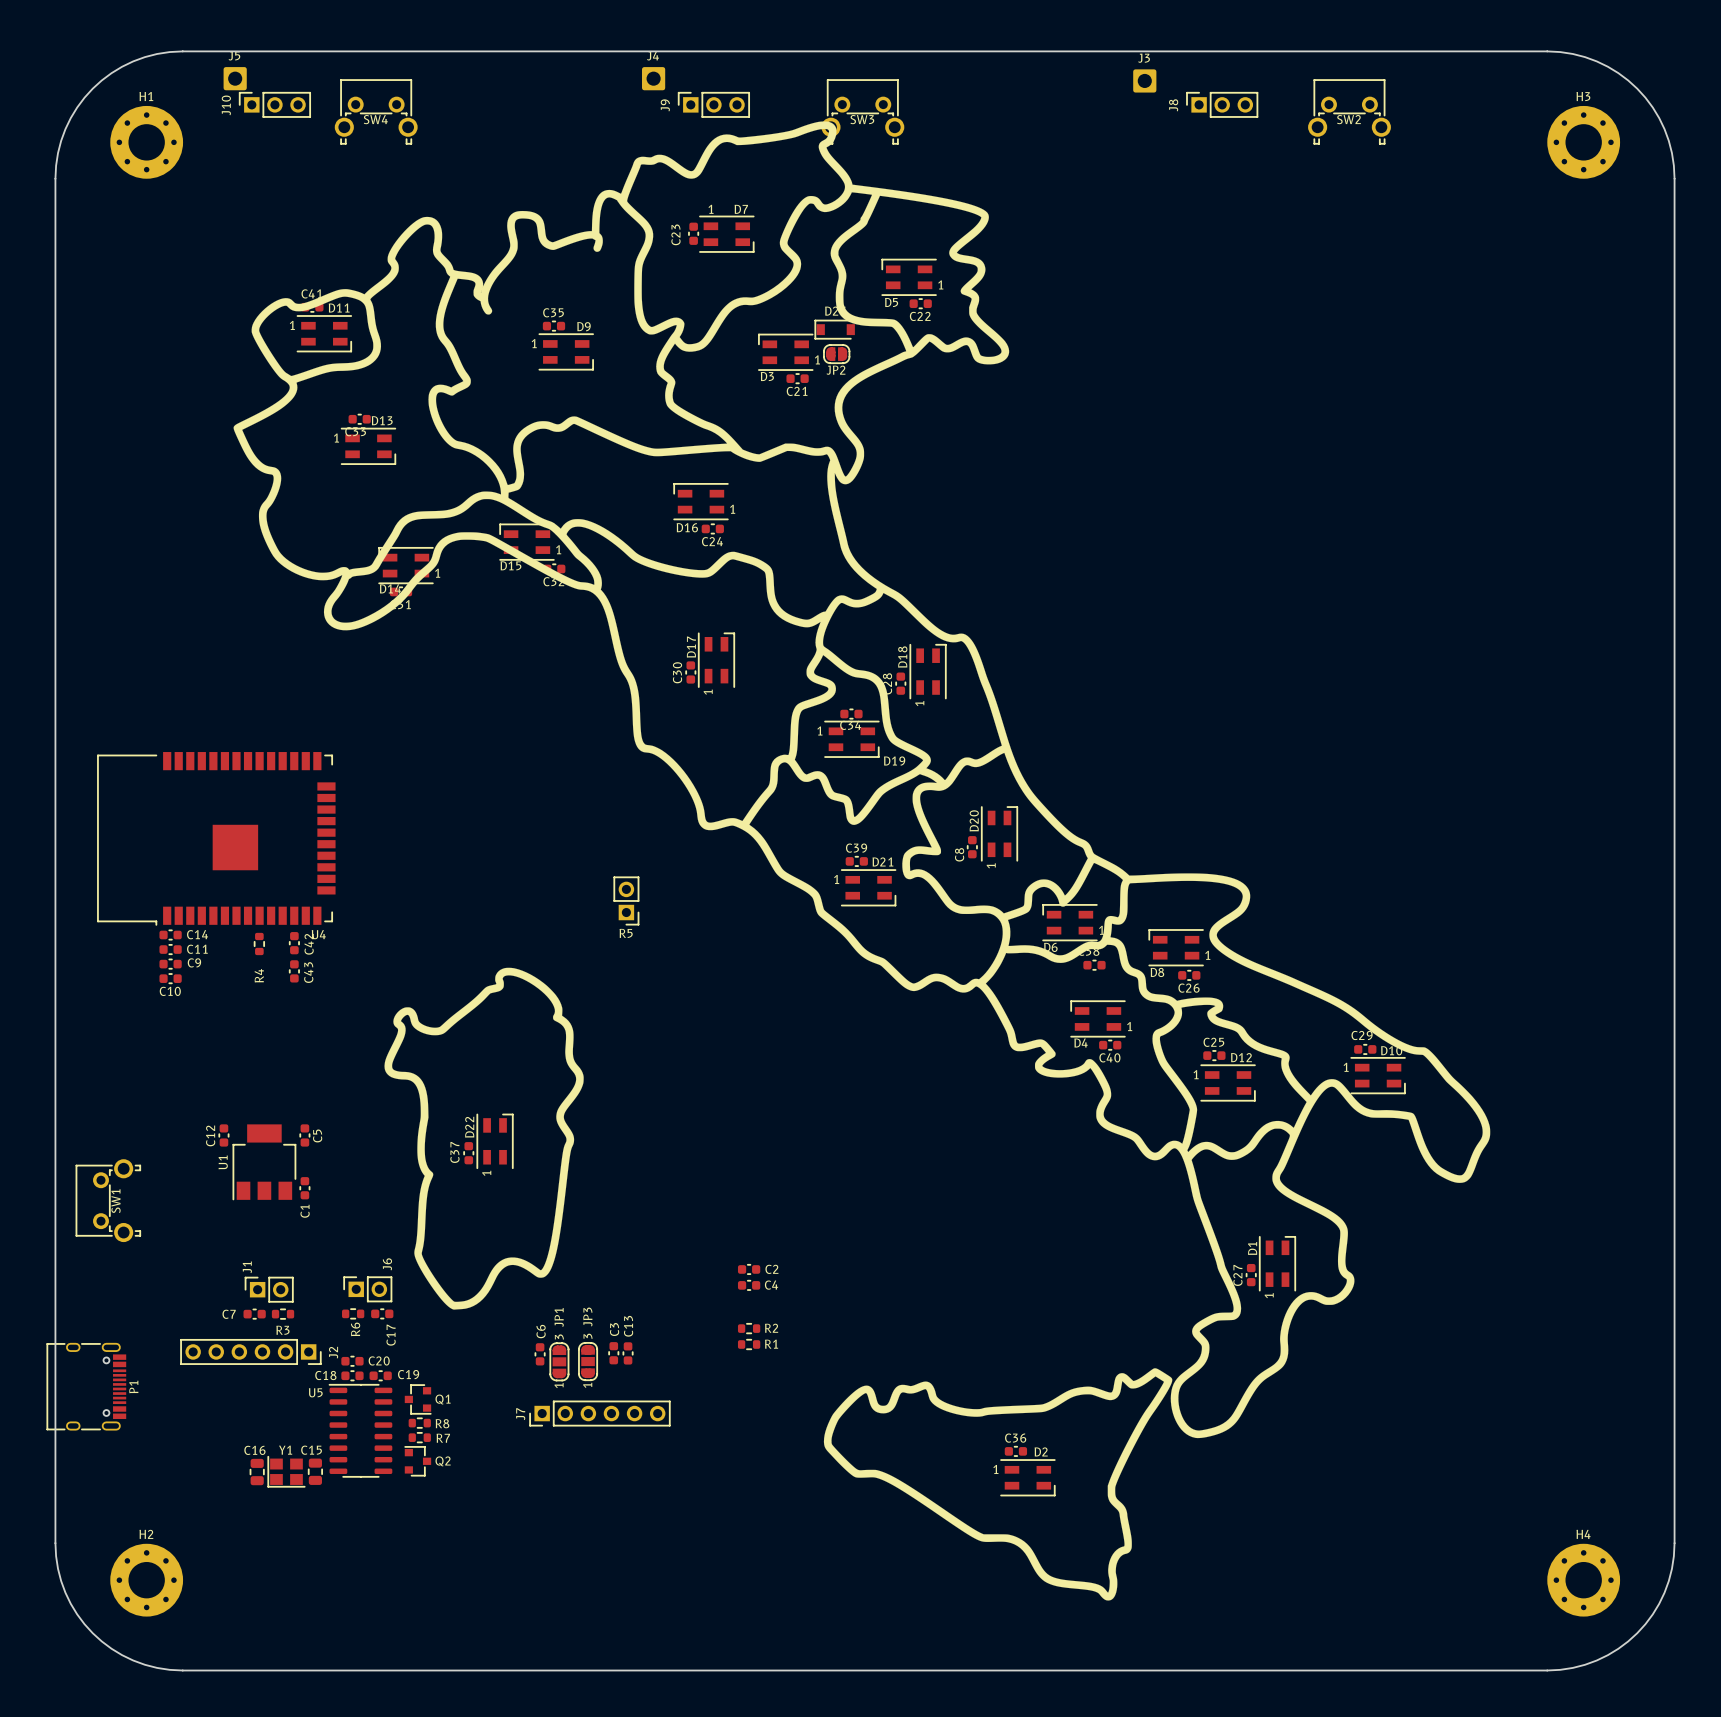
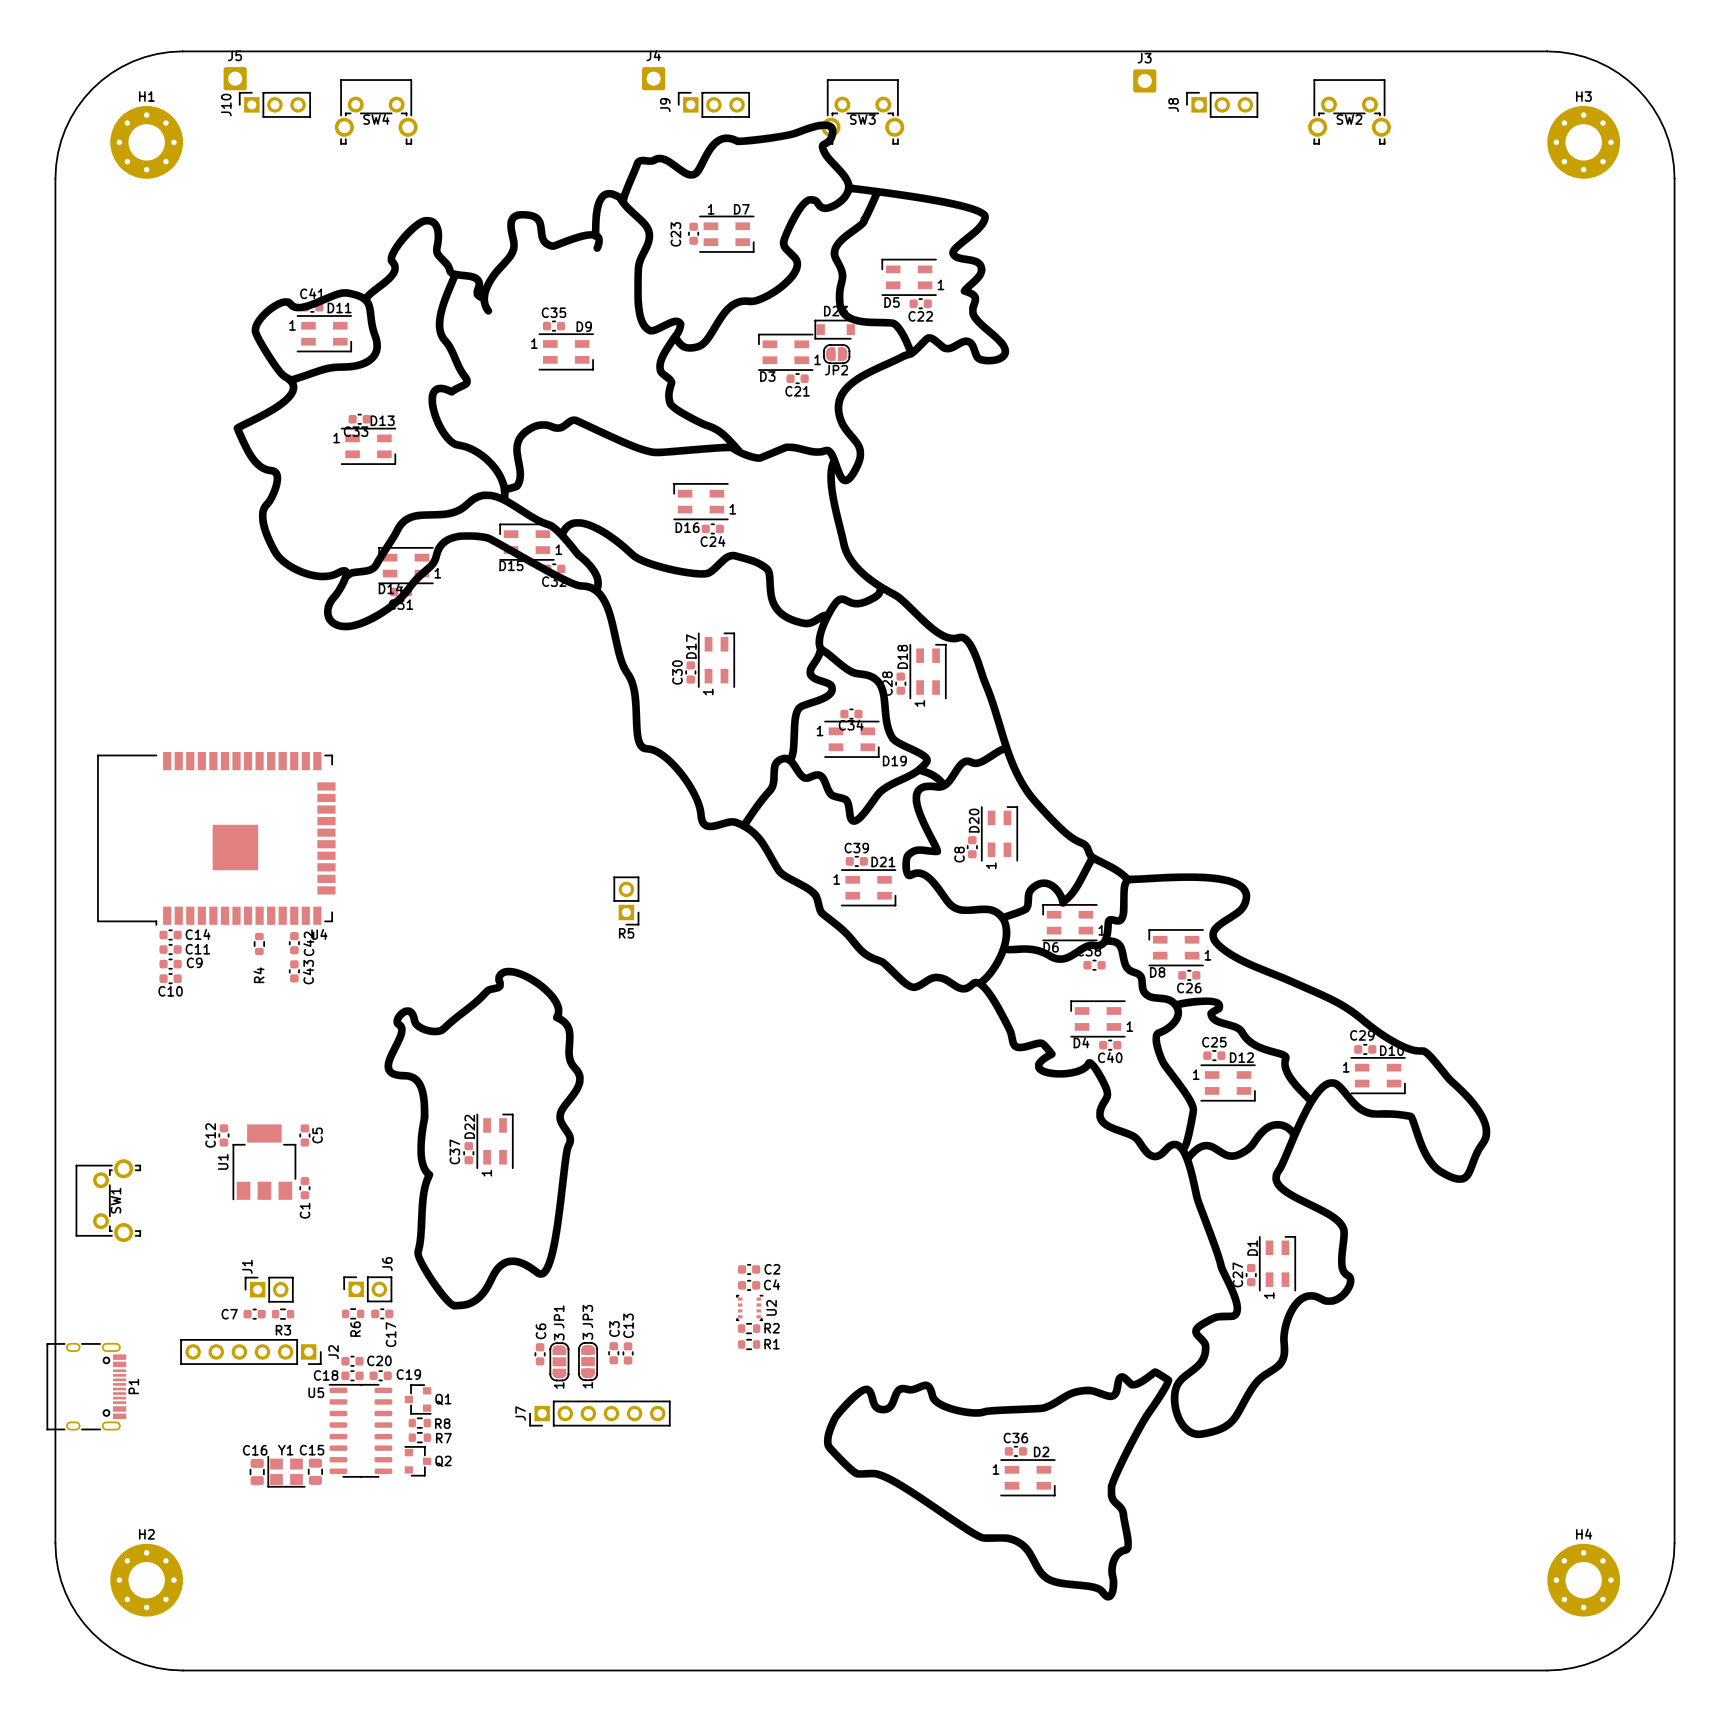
U2: none -> (749, 1307)

